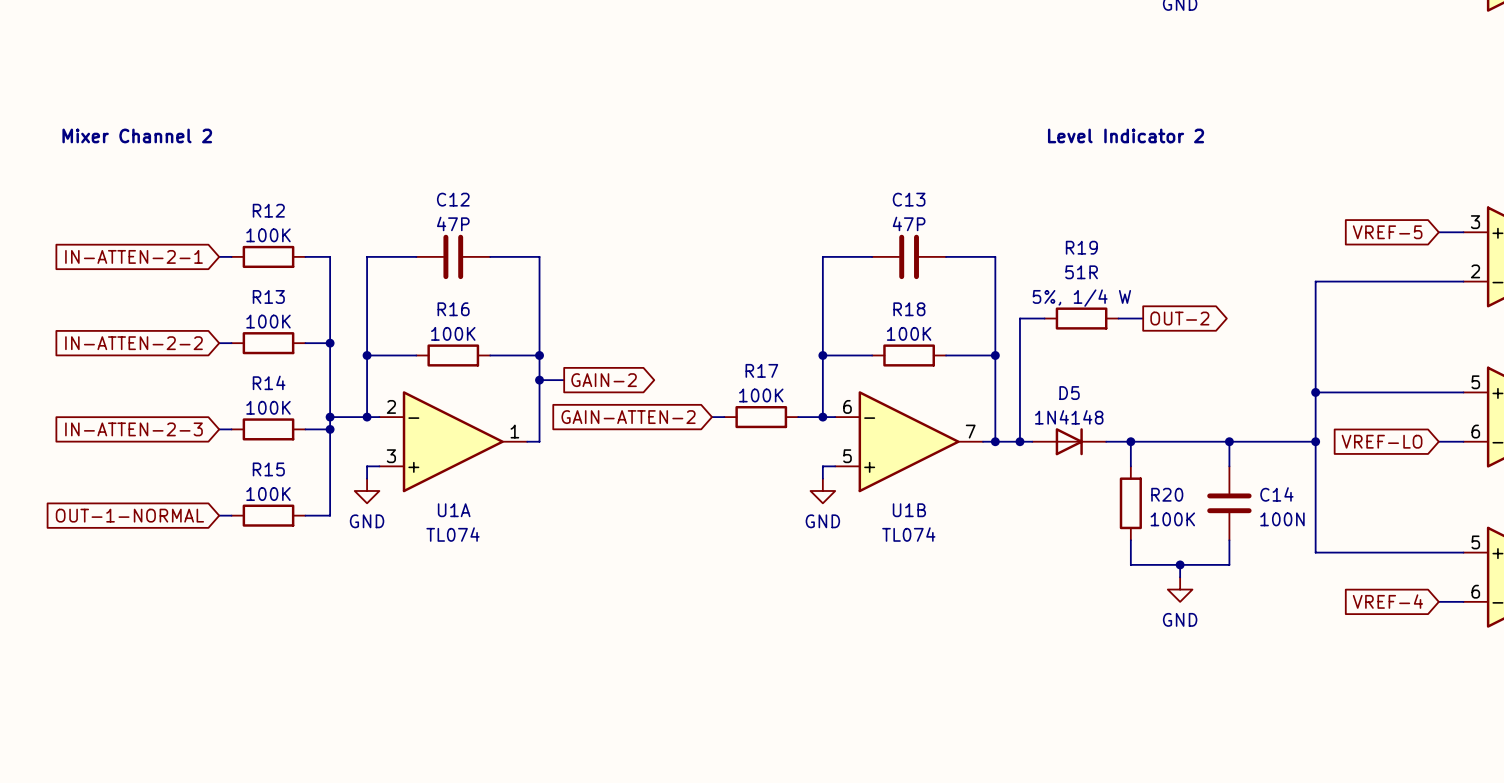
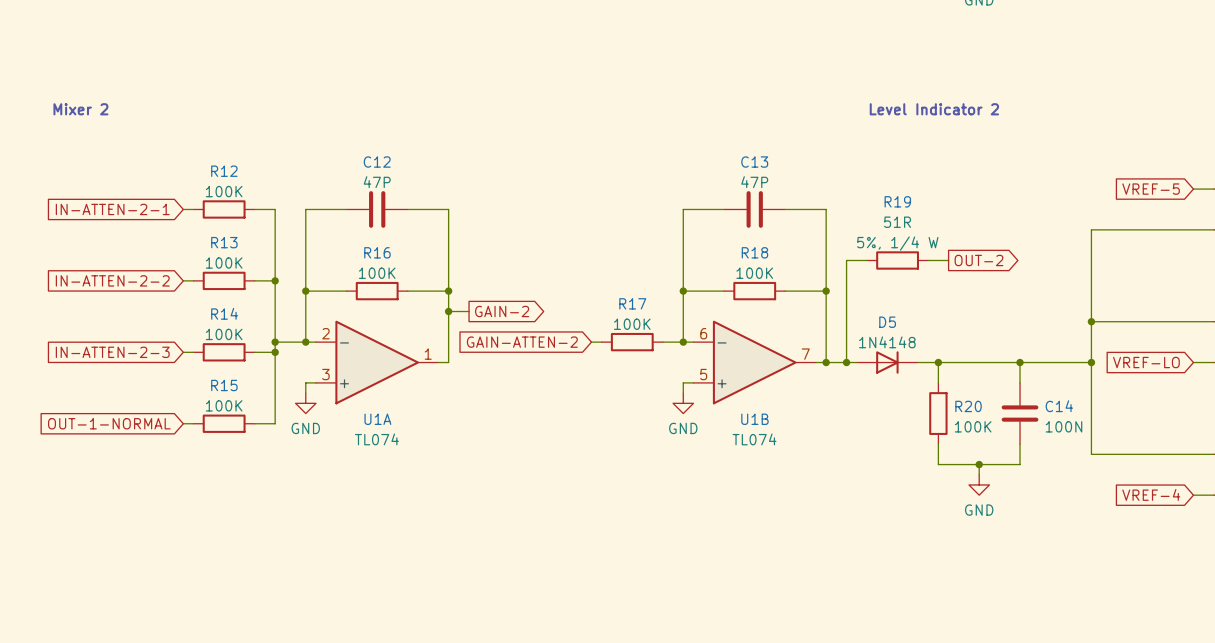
text: Mixer Channel 2 (137, 135) -> Mixer 2 (80, 109)

